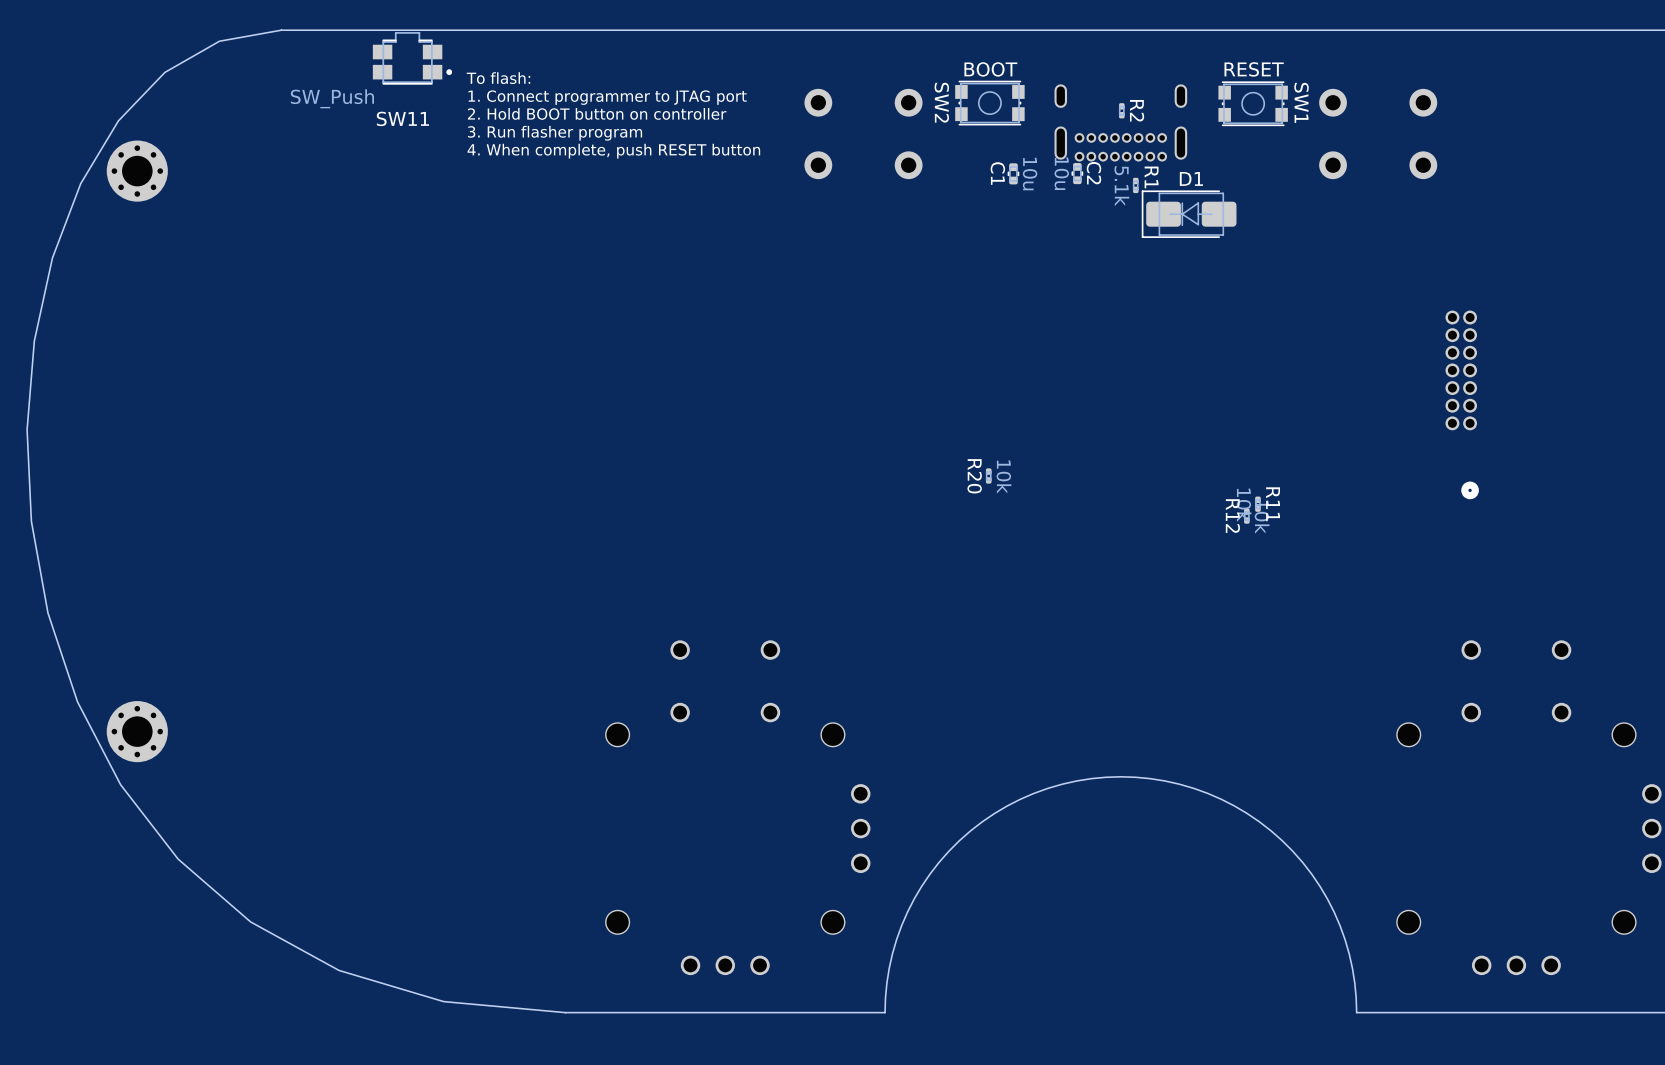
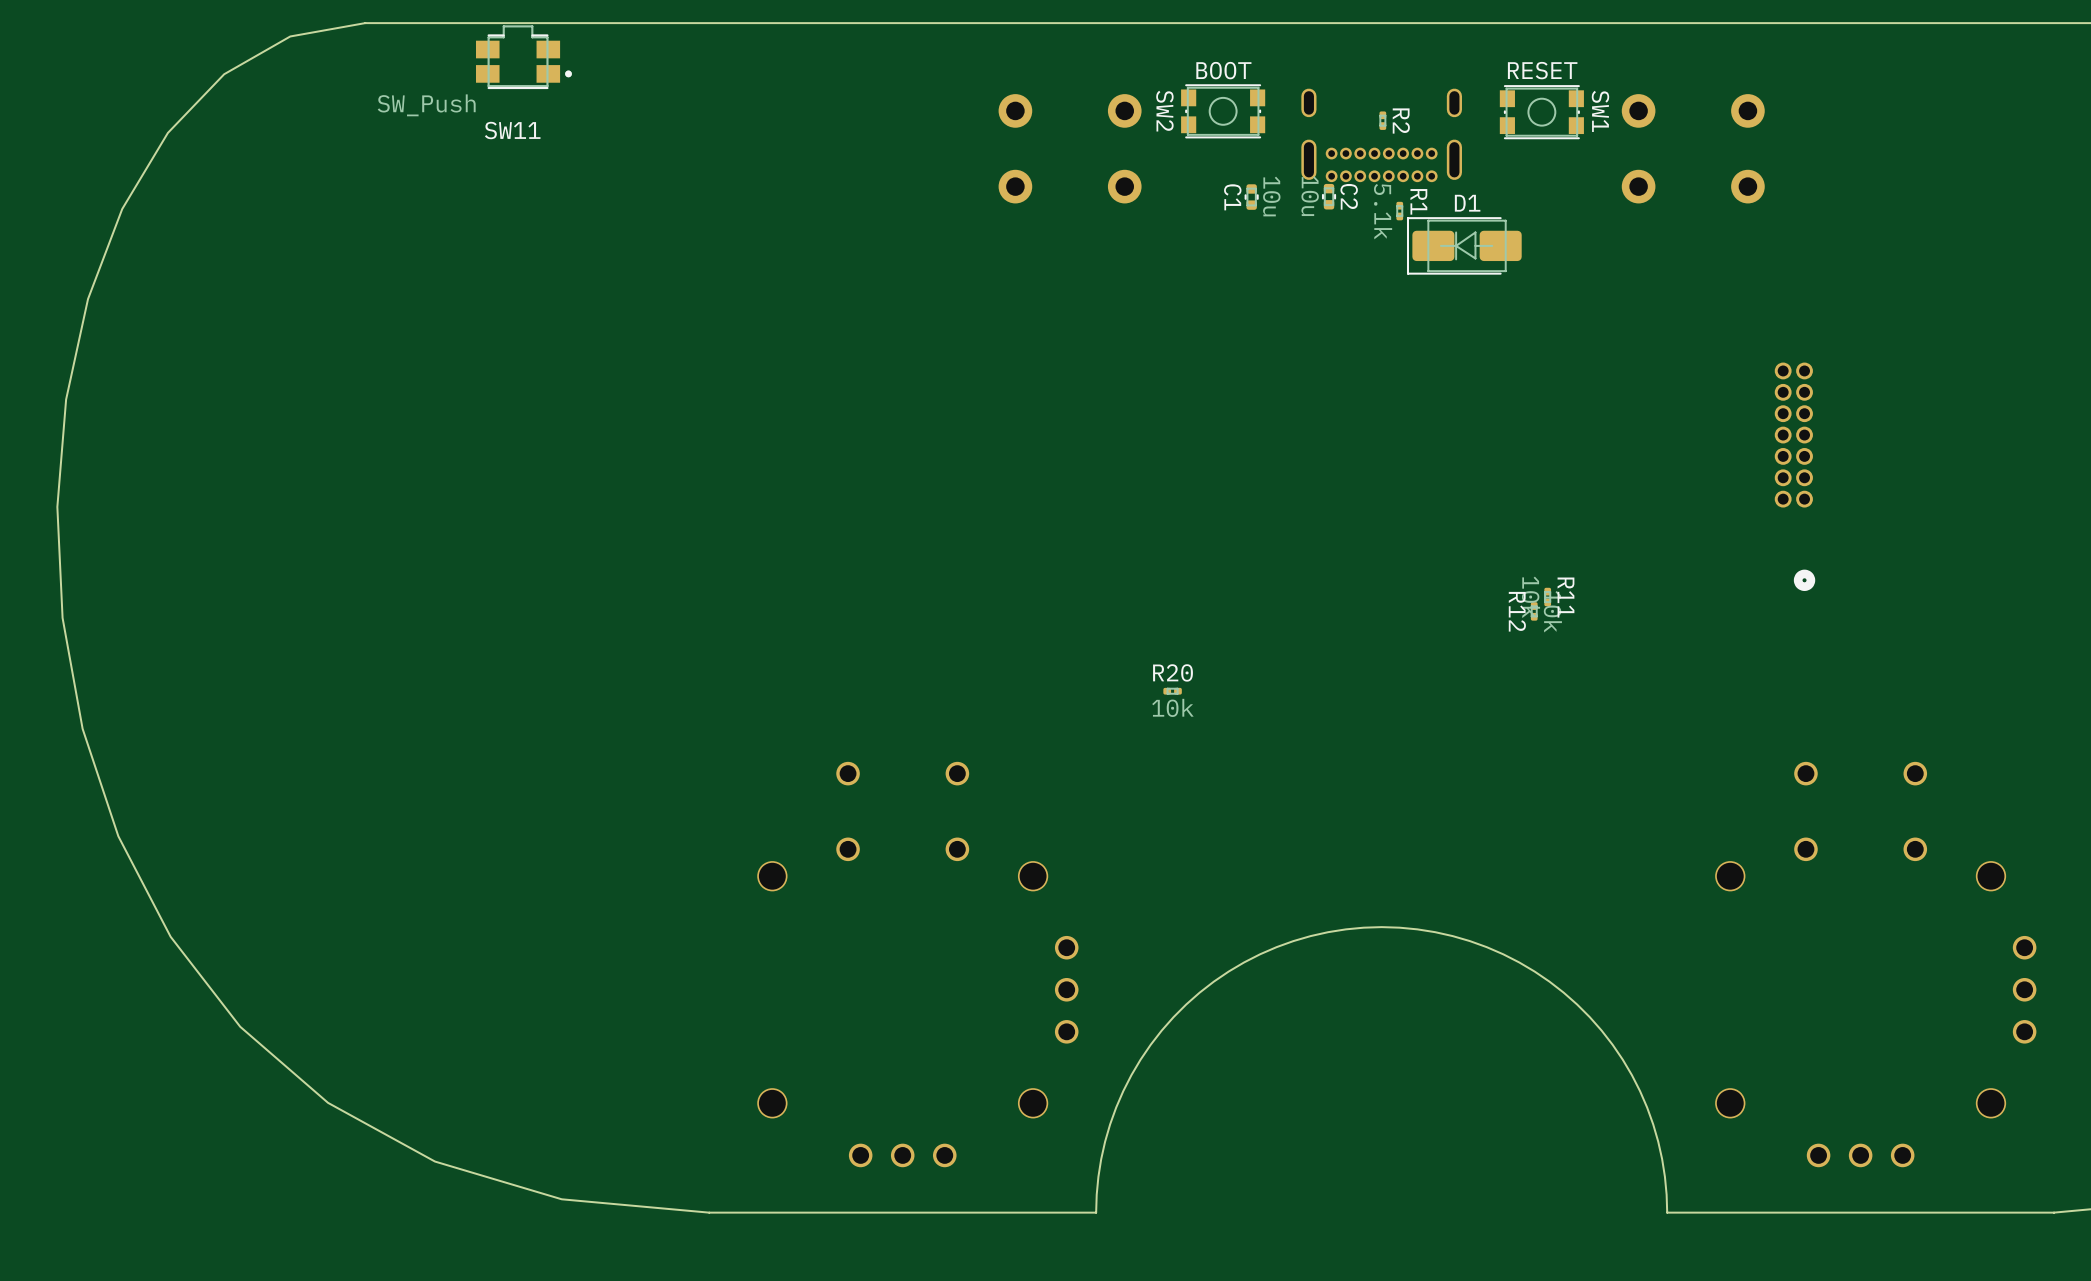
text: To flash: (498, 78) -> none
text: 1. Connect programmer to JTAG port (607, 97) -> none
text: 2. Hold BOOT button on controller (597, 113) -> none
text: 3. Run flasher program (555, 133) -> none
text: 4. When complete, push RESET button (613, 151) -> none
part: (137, 171) -> none
R20 rotation: 0° (988, 476) -> 90° clockwise (1172, 691)
R20 position: (988, 476) -> (1172, 691)
part: (137, 731) -> none

